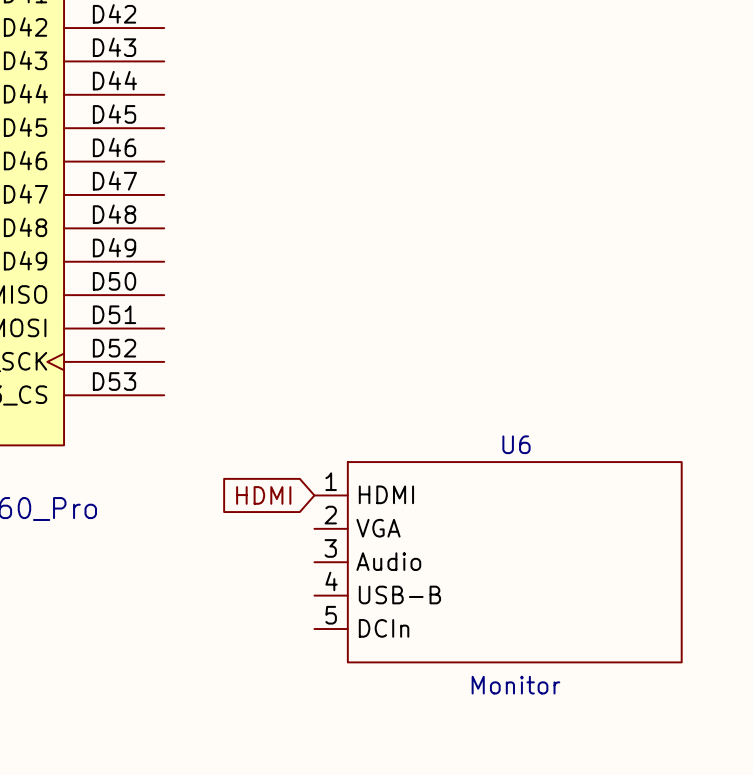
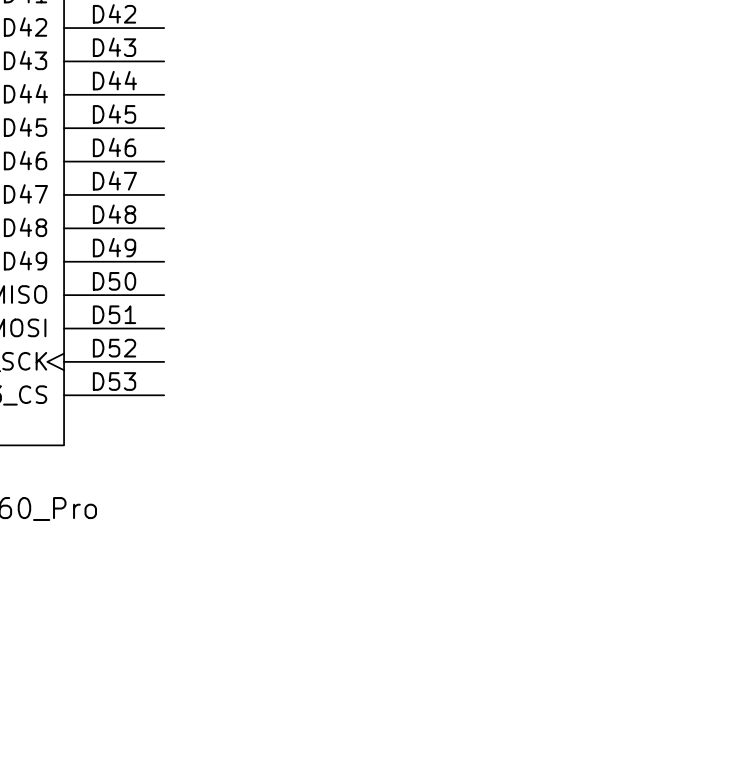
global label: HDMI (263, 495) -> none
U6: Monitor (498, 562) -> none

